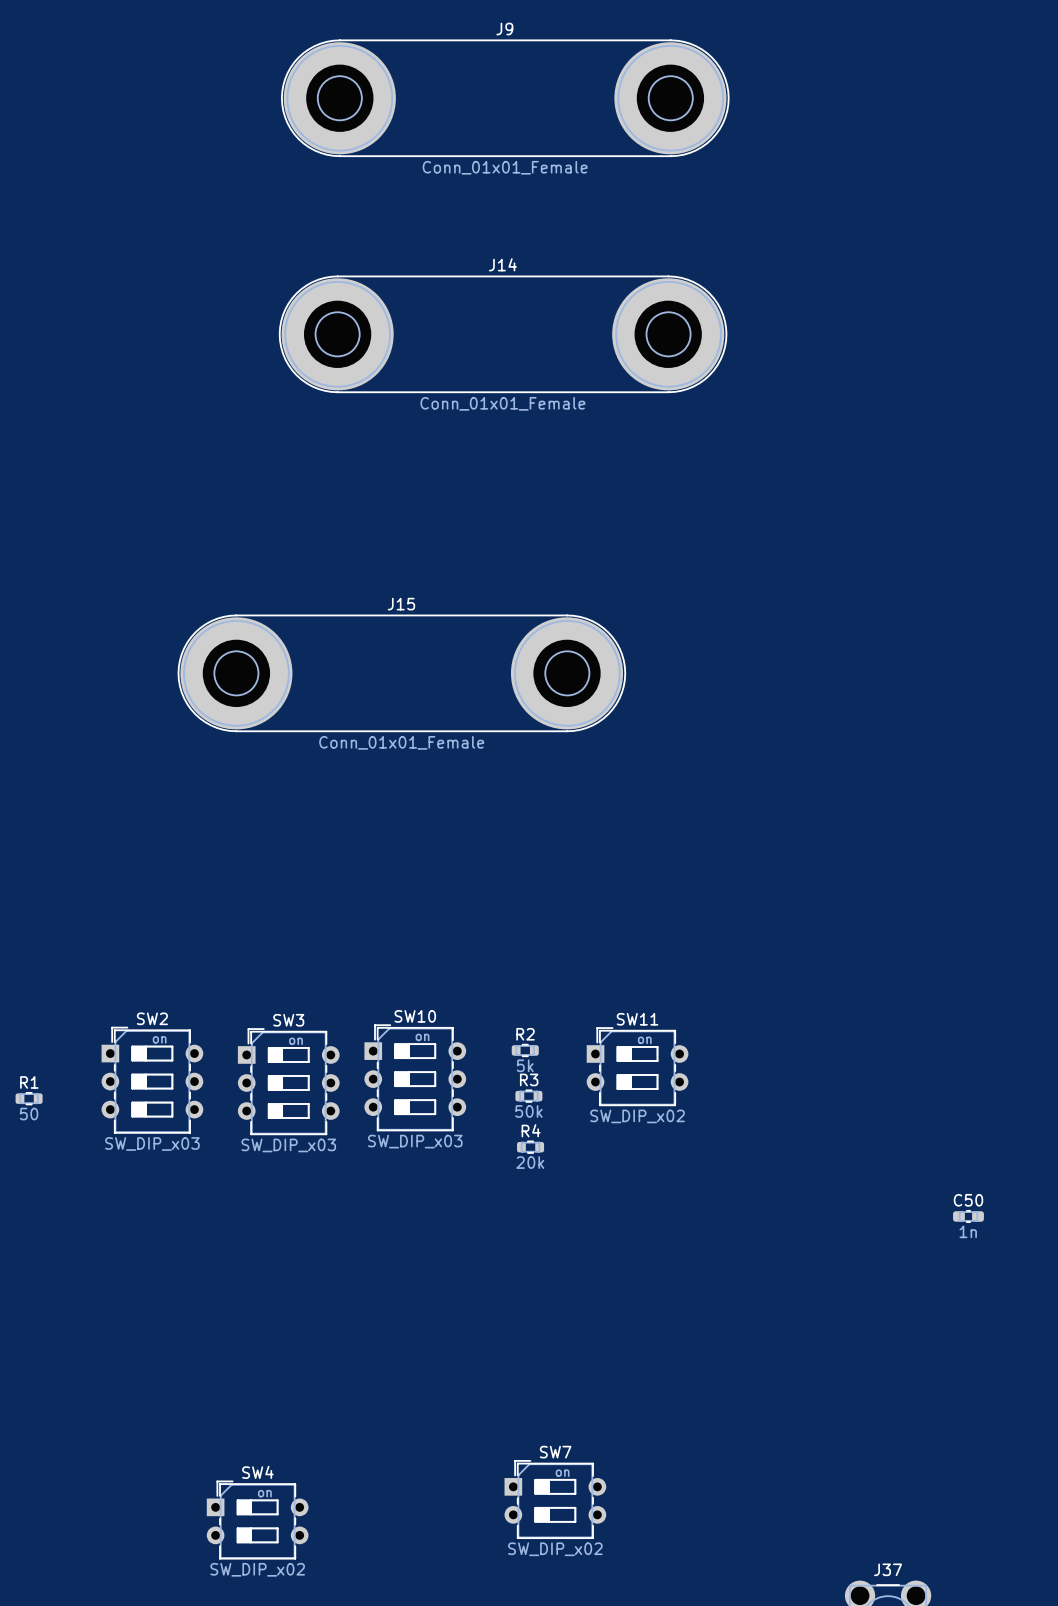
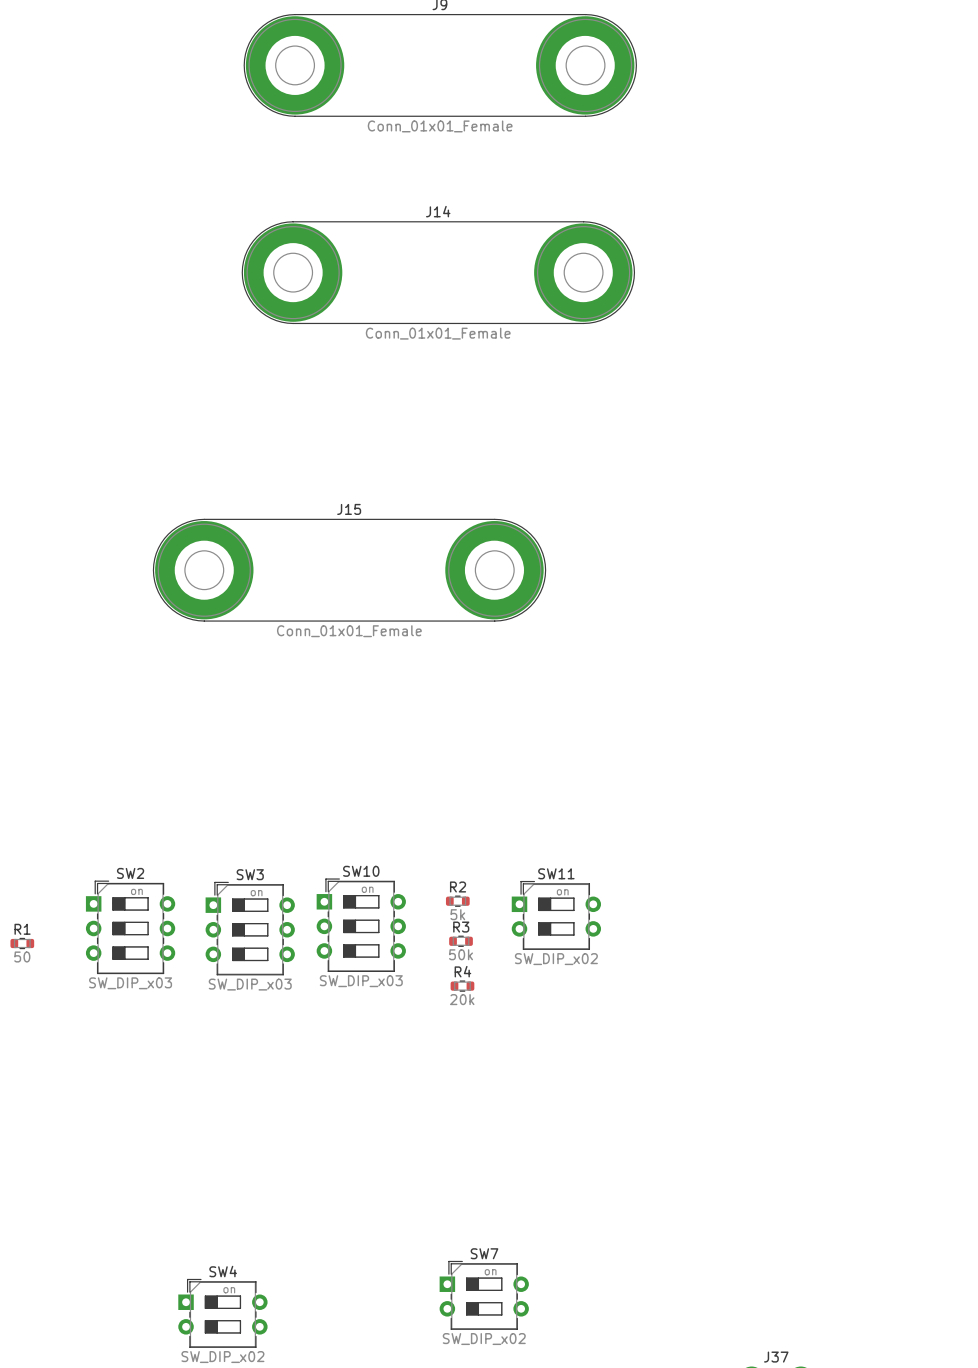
C50: 1n (968, 1216) -> none

